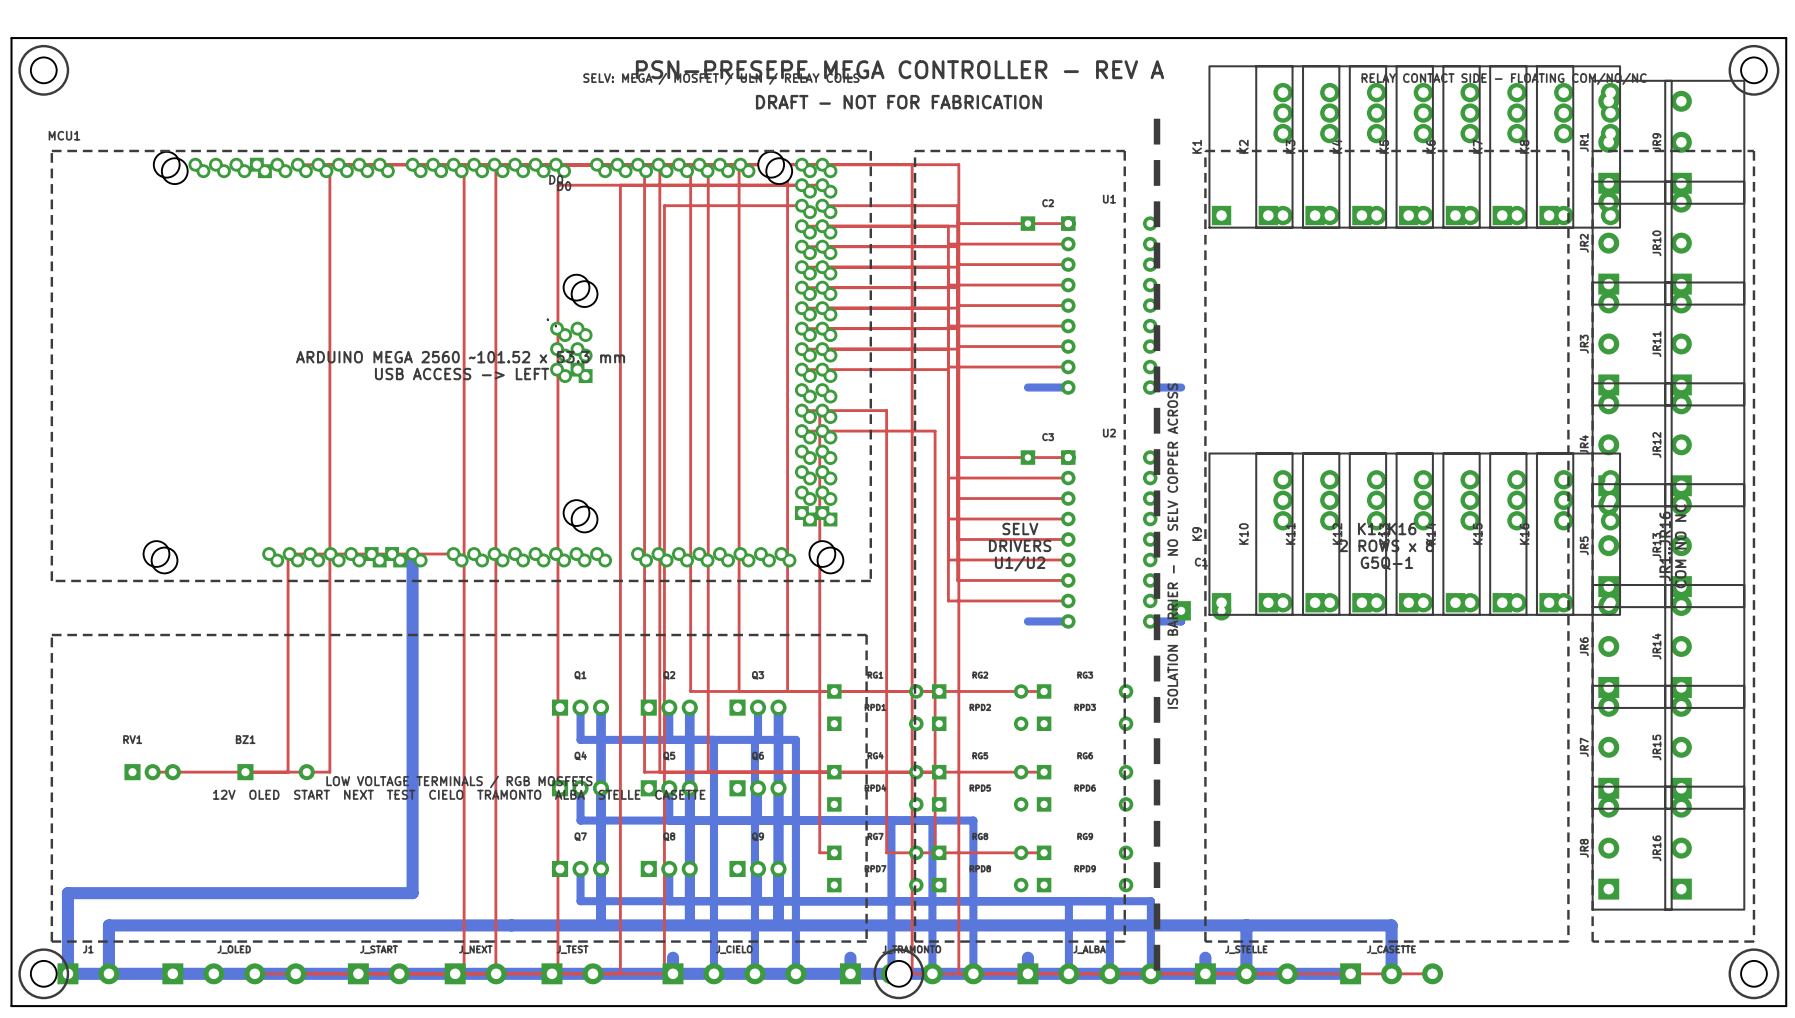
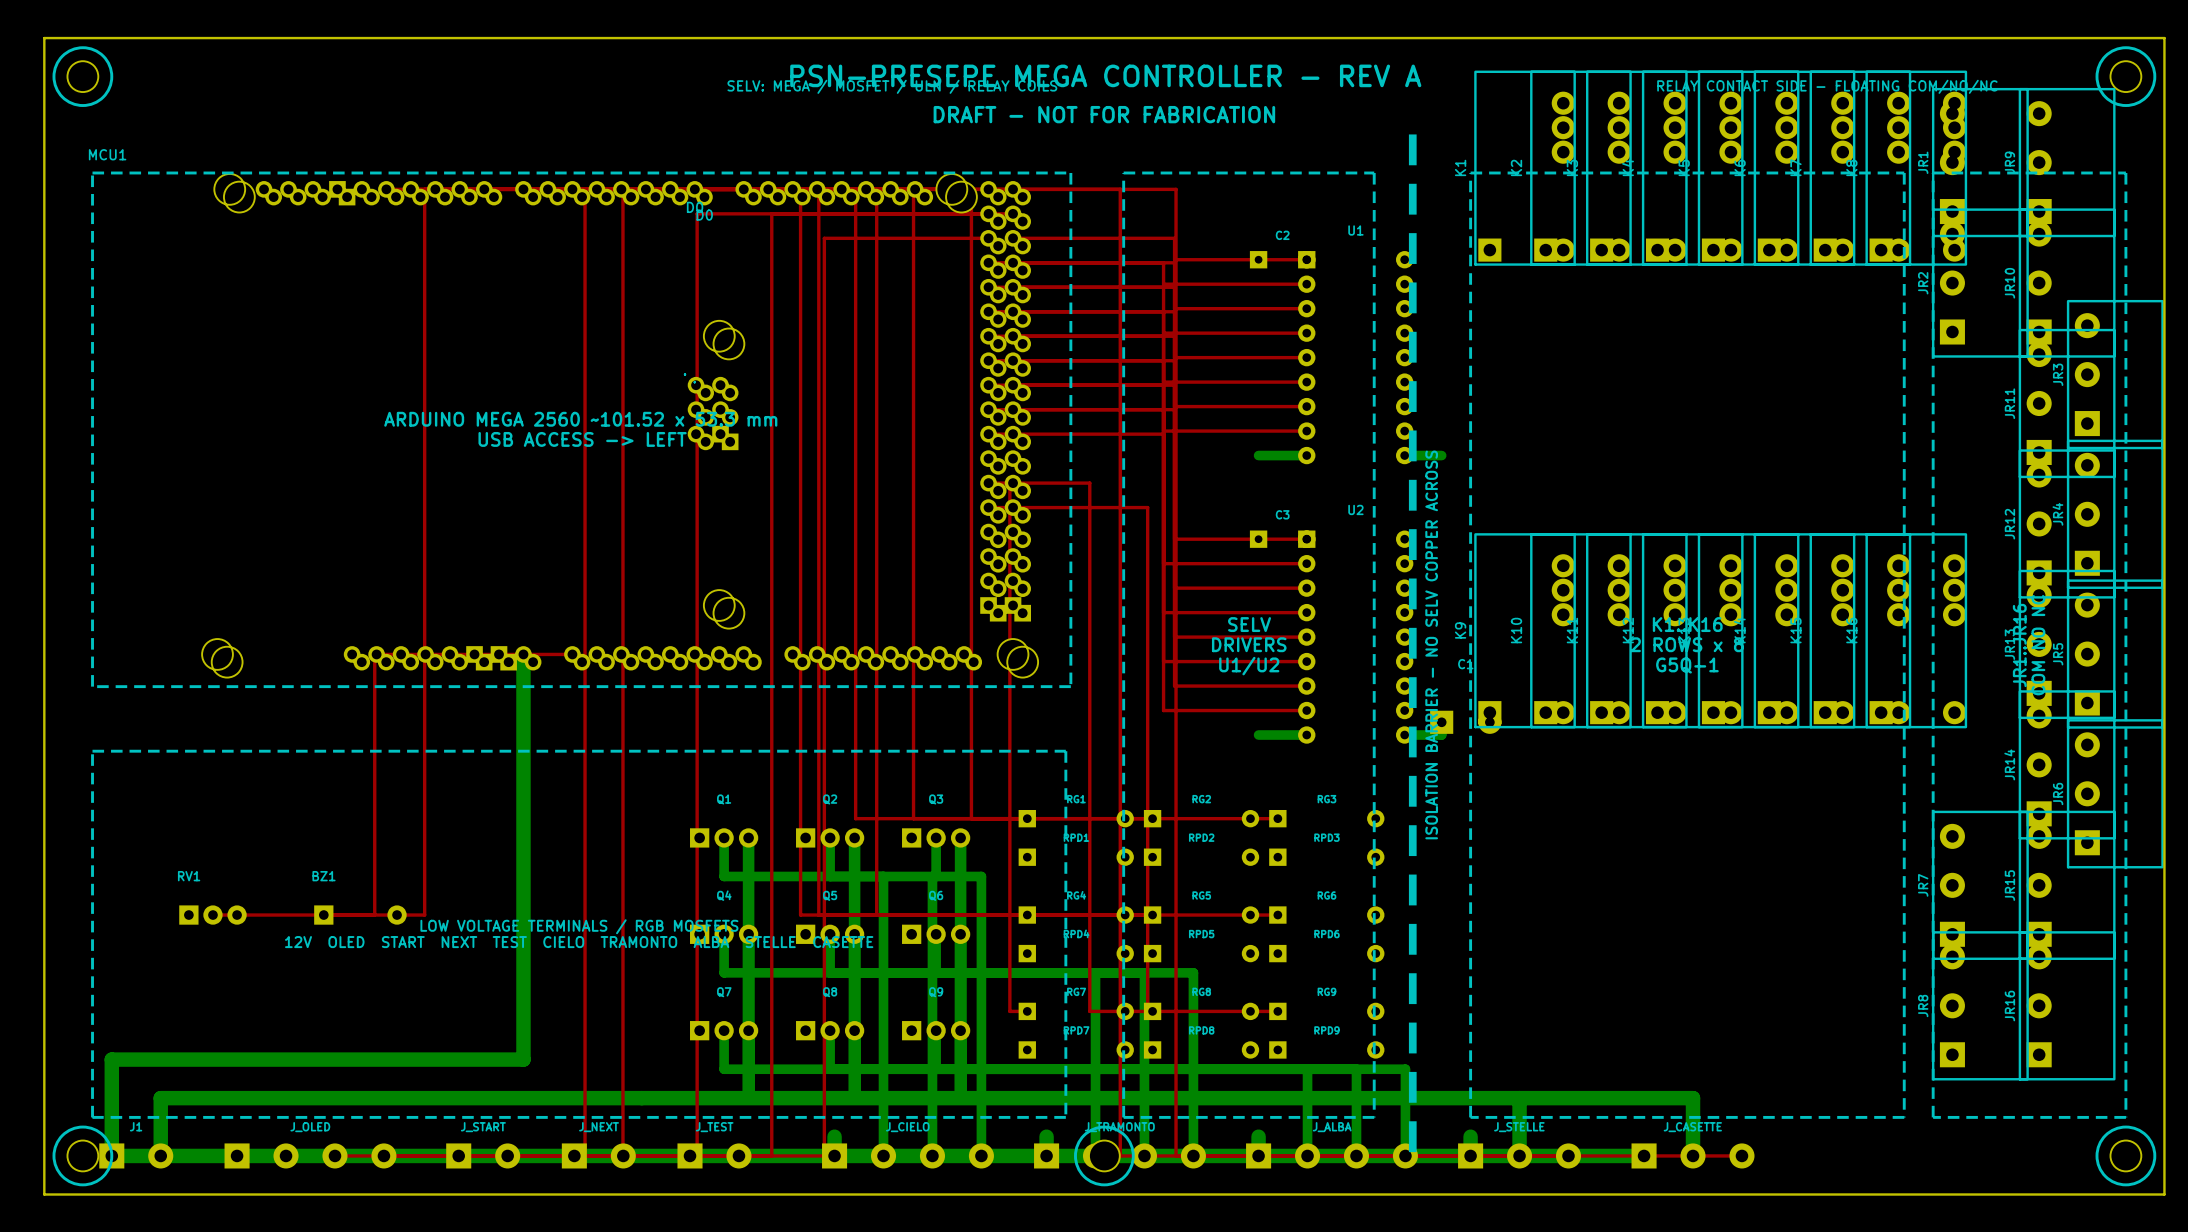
JR3 position: (1632, 343) -> (2115, 374)
JR4 position: (1632, 444) -> (2115, 514)
JR5 position: (1632, 545) -> (2115, 654)
JR6 position: (1632, 646) -> (2115, 793)

